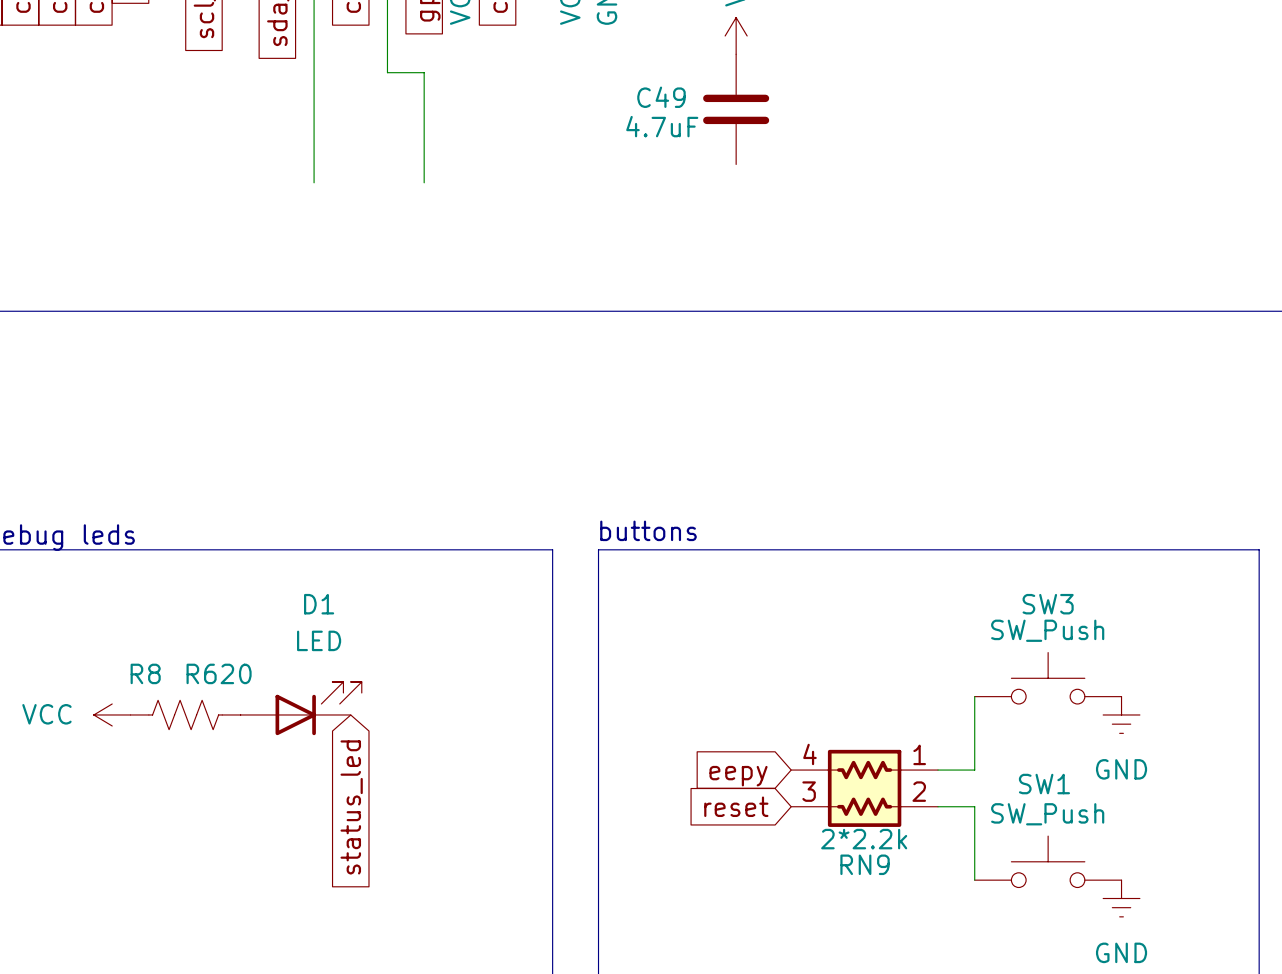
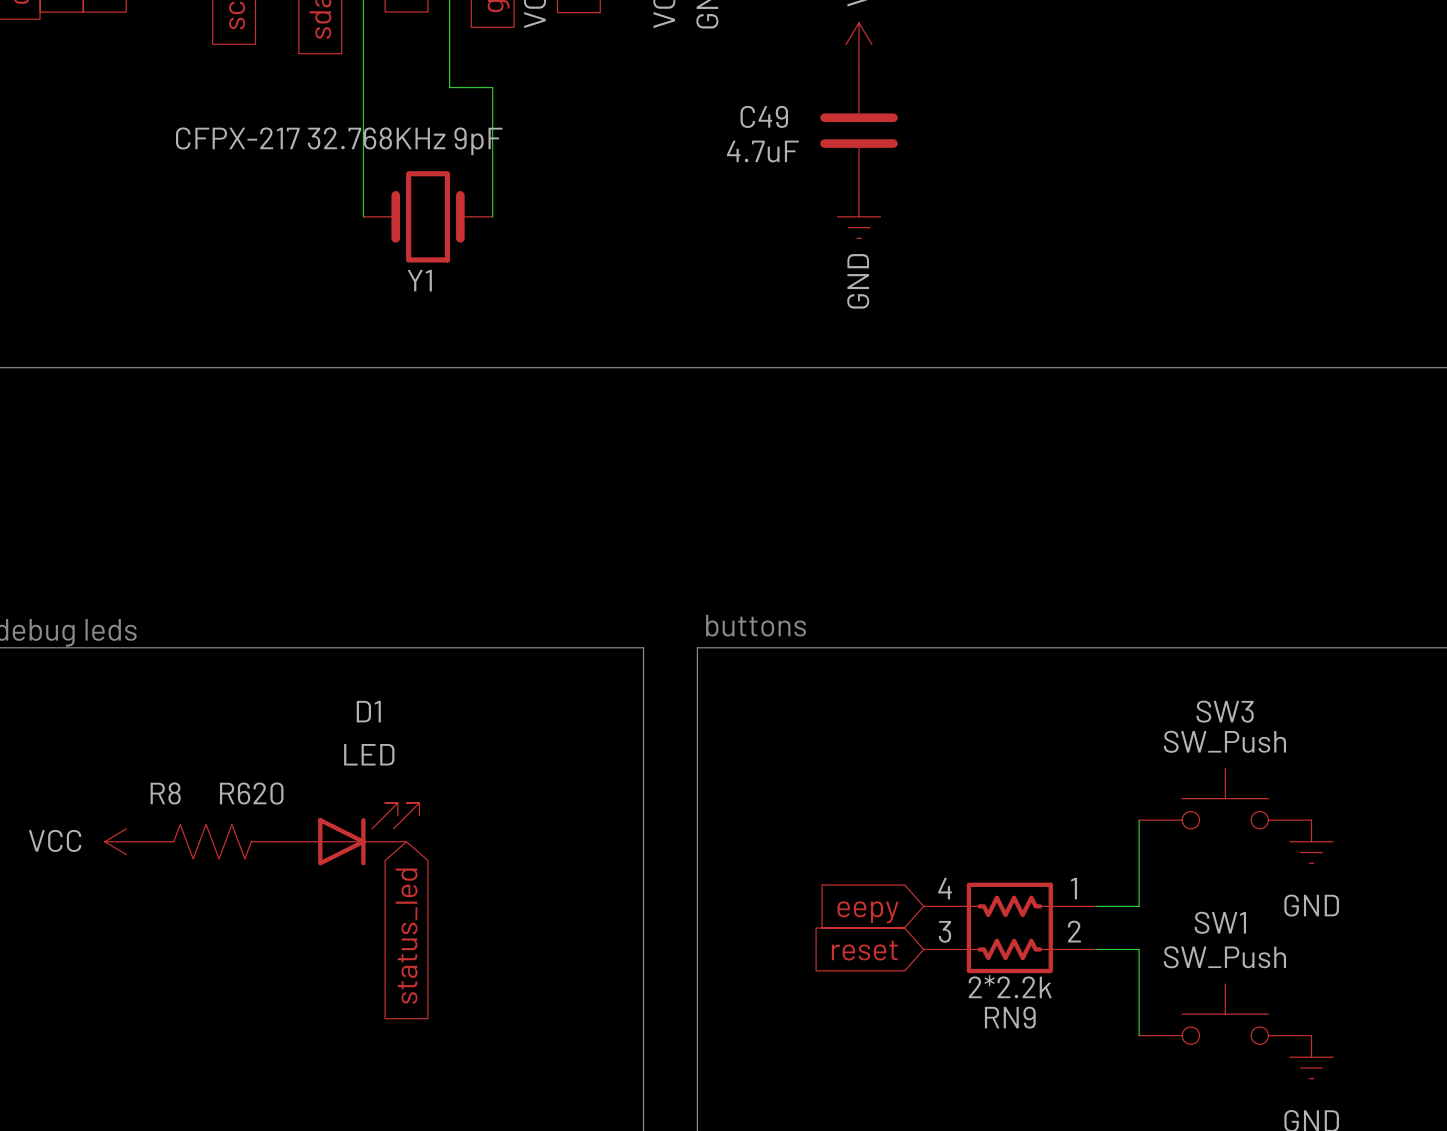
Y1: none -> CFPX-217 32.768KHz 9pF (428, 216)
power symbol: none -> GND (859, 216)

